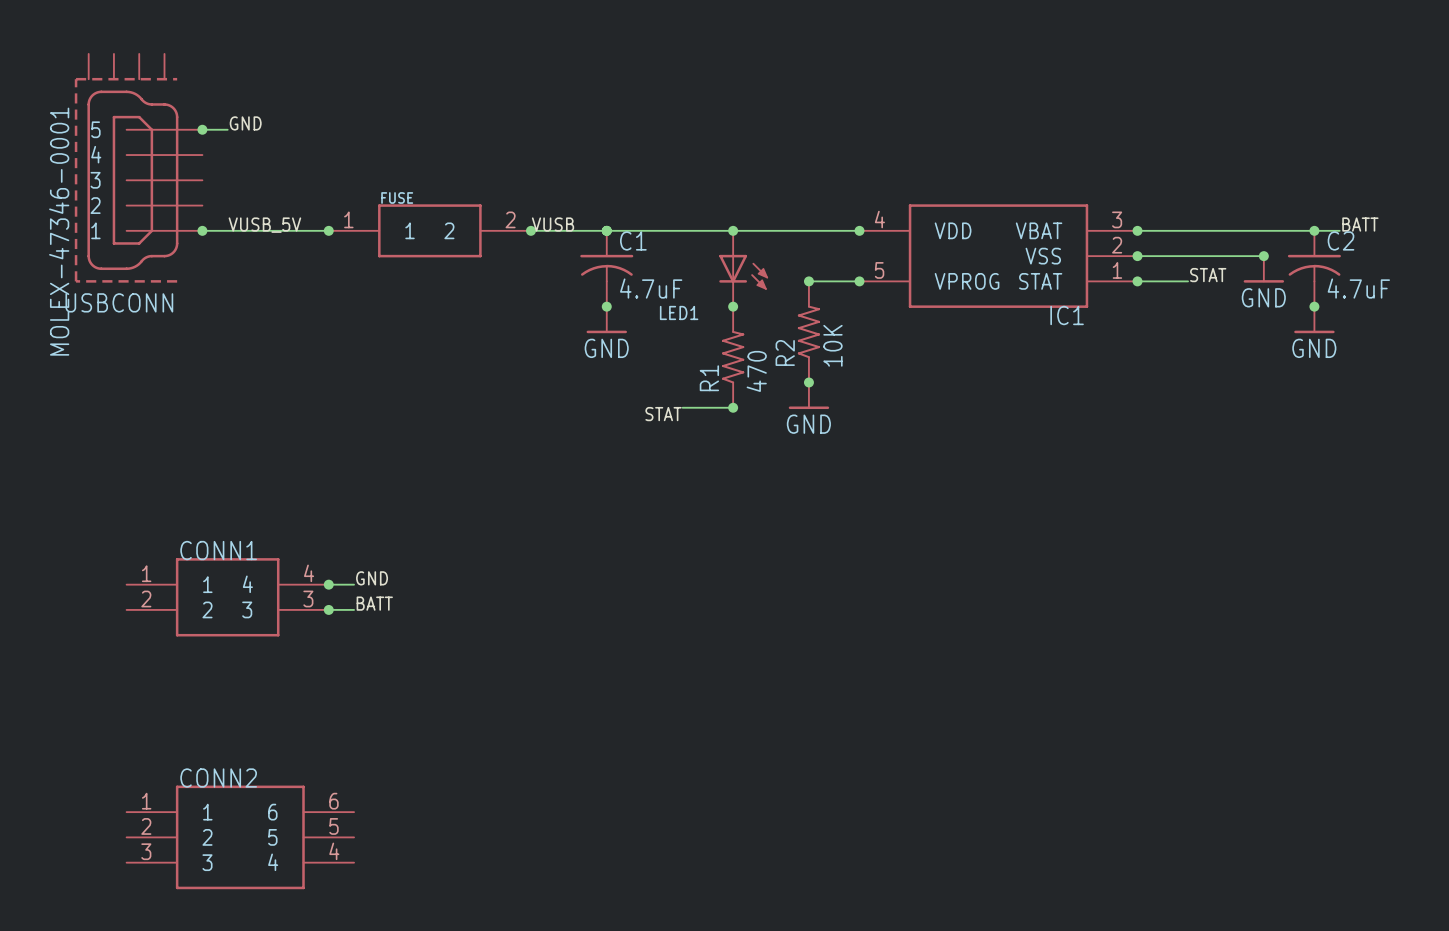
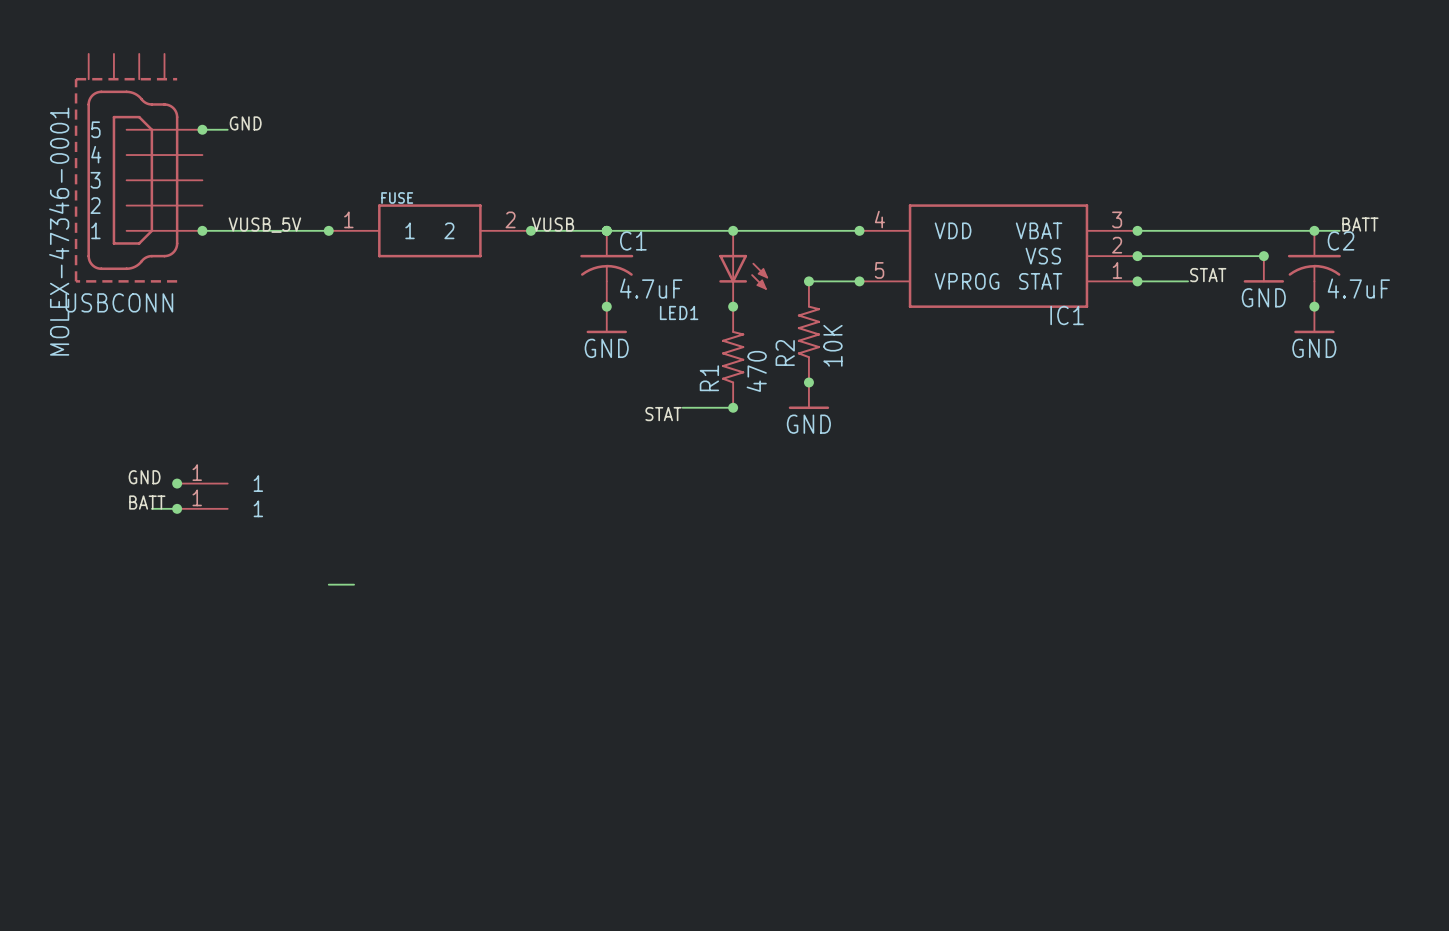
label: none -> GND (144, 477)
junction: none -> (177, 483)
part: none -> (202, 483)
label: none -> BATT (147, 502)
junction: none -> (177, 508)
part: none -> (202, 508)
label: GND (372, 578) -> none
junction: (328, 584) -> none
CONN1: (227, 597) -> none
label: BATT (374, 603) -> none
wire: (328, 609) (354, 609) -> (151, 508) (177, 508)
junction: (328, 609) -> none
CONN2: (240, 837) -> none

